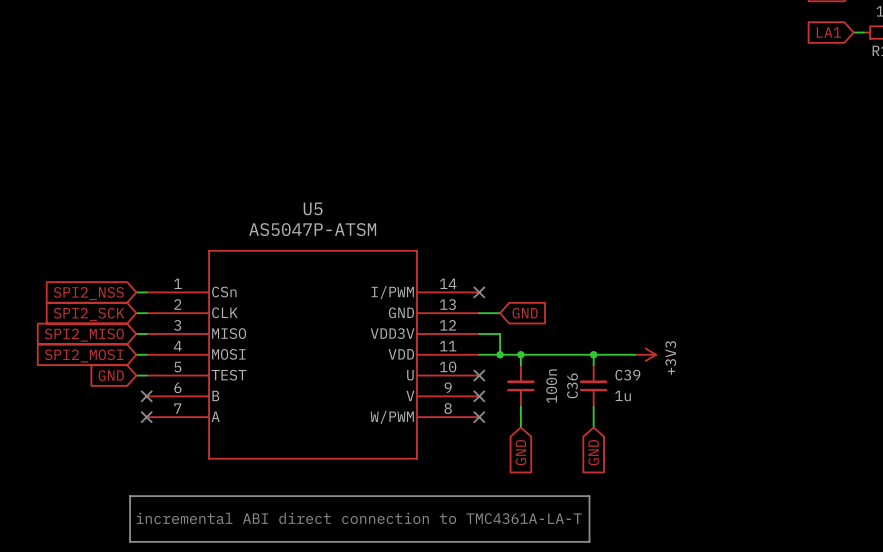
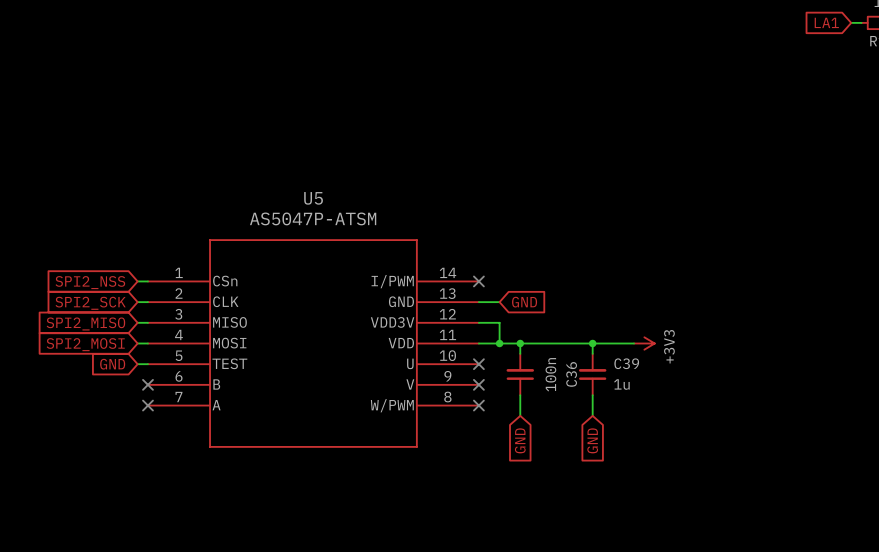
line: (130, 496) (589, 496) (589, 541) (130, 541) (130, 496) -> none
text: incremental ABI direct connection to TMC4361A-LA-T (359, 518) -> none

